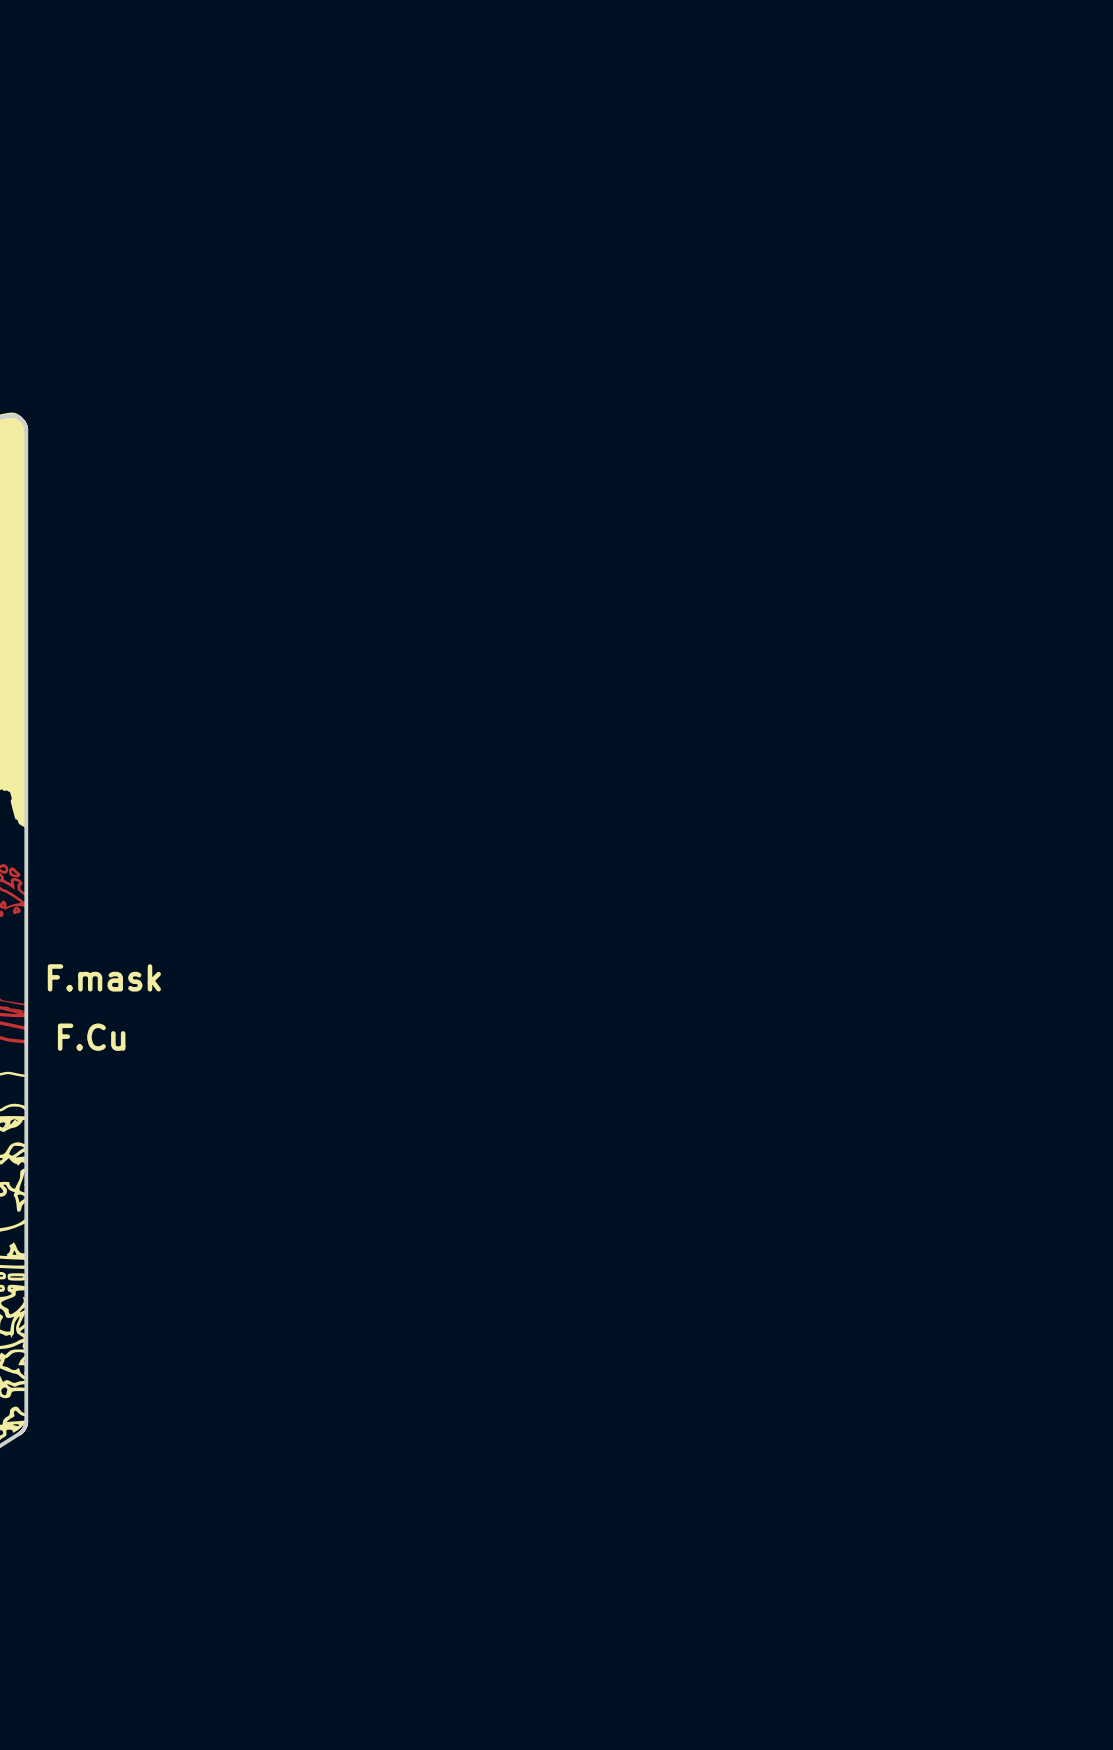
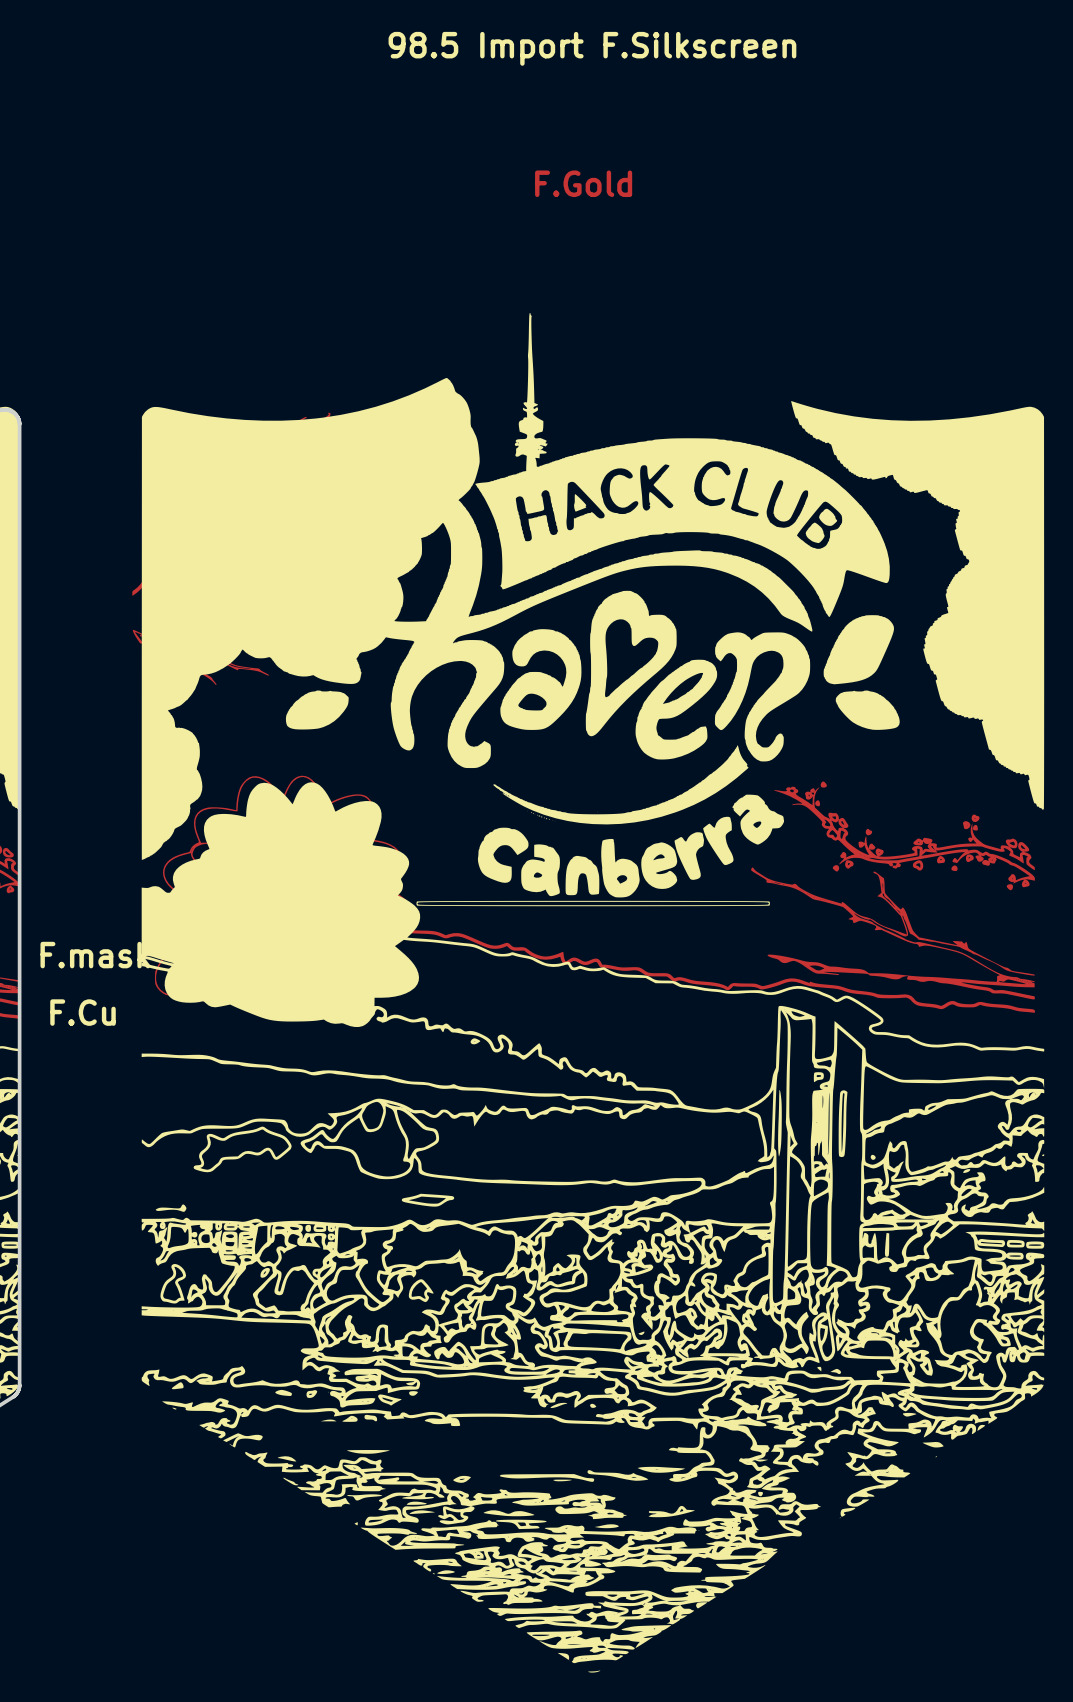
F.Gold: none -> (583, 717)
98.5 Import F.Silkscreen: none -> (592, 992)

